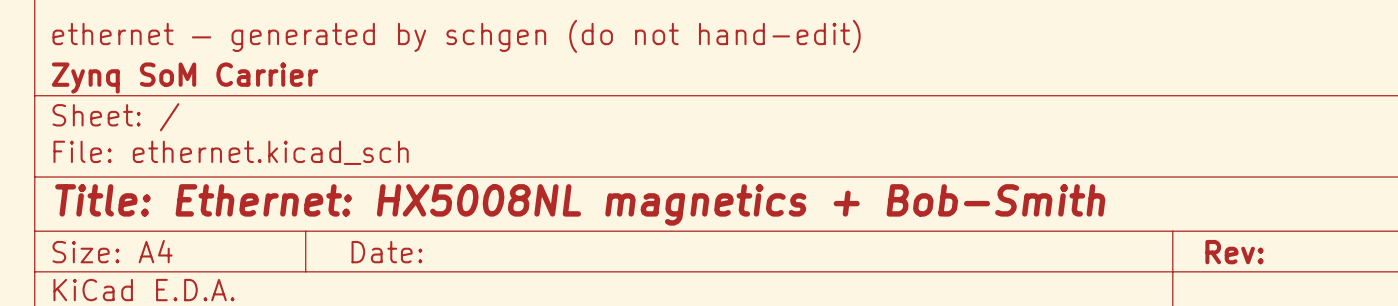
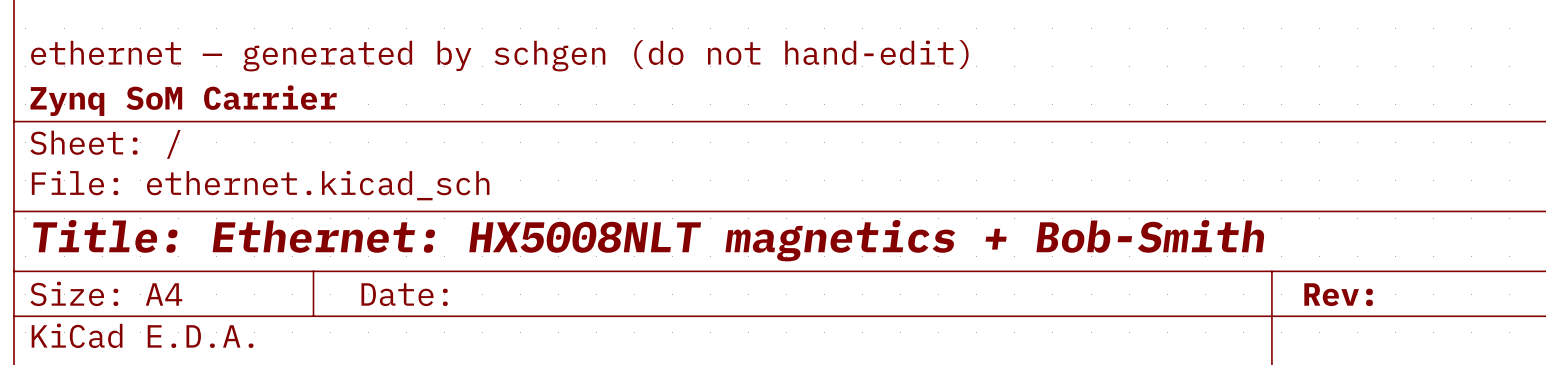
title block: Title: Ethernet: HX5008NL magnetics + Bob-Smith (580, 204) -> Title: Ethernet: HX5008NLT magnetics + Bob-Smith (648, 240)

